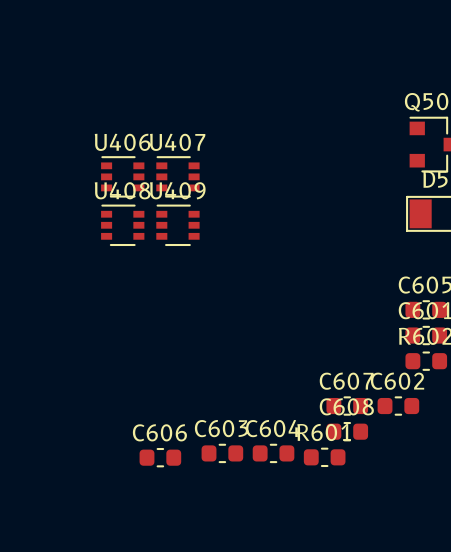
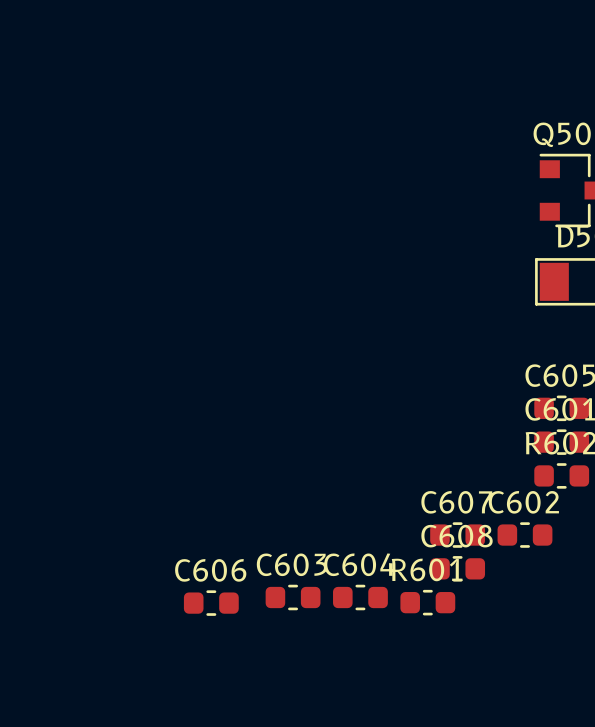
U406: (122, 176) -> none
U407: (177, 176) -> none
U408: (122, 225) -> none
U409: (177, 225) -> none

